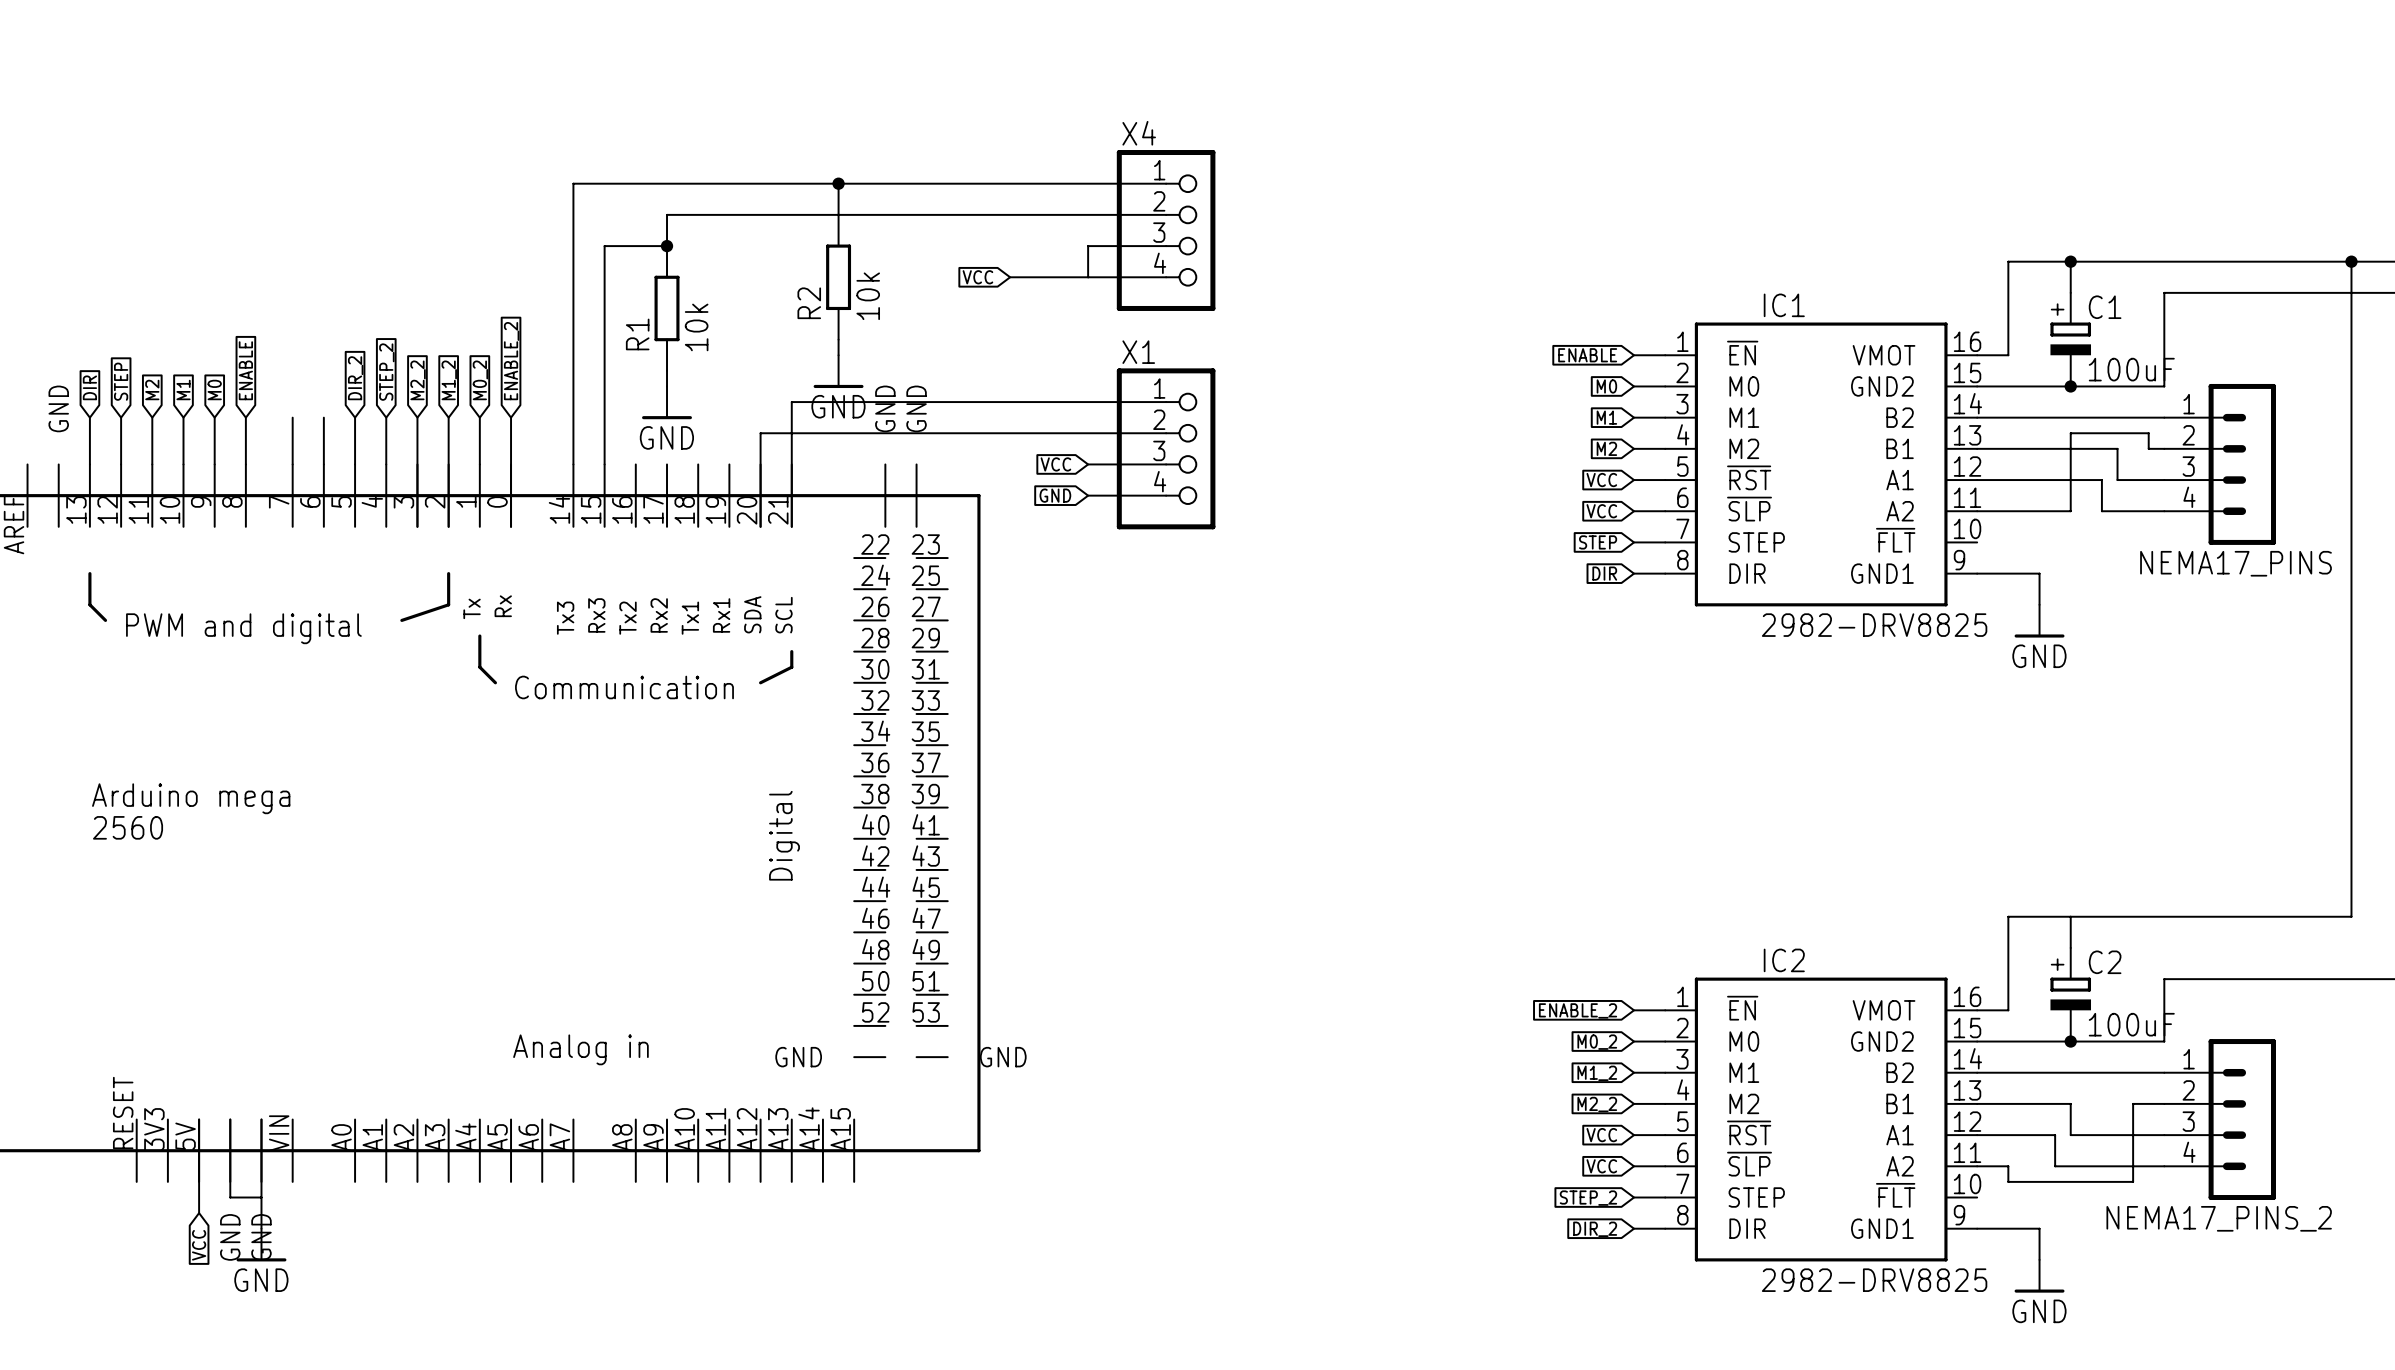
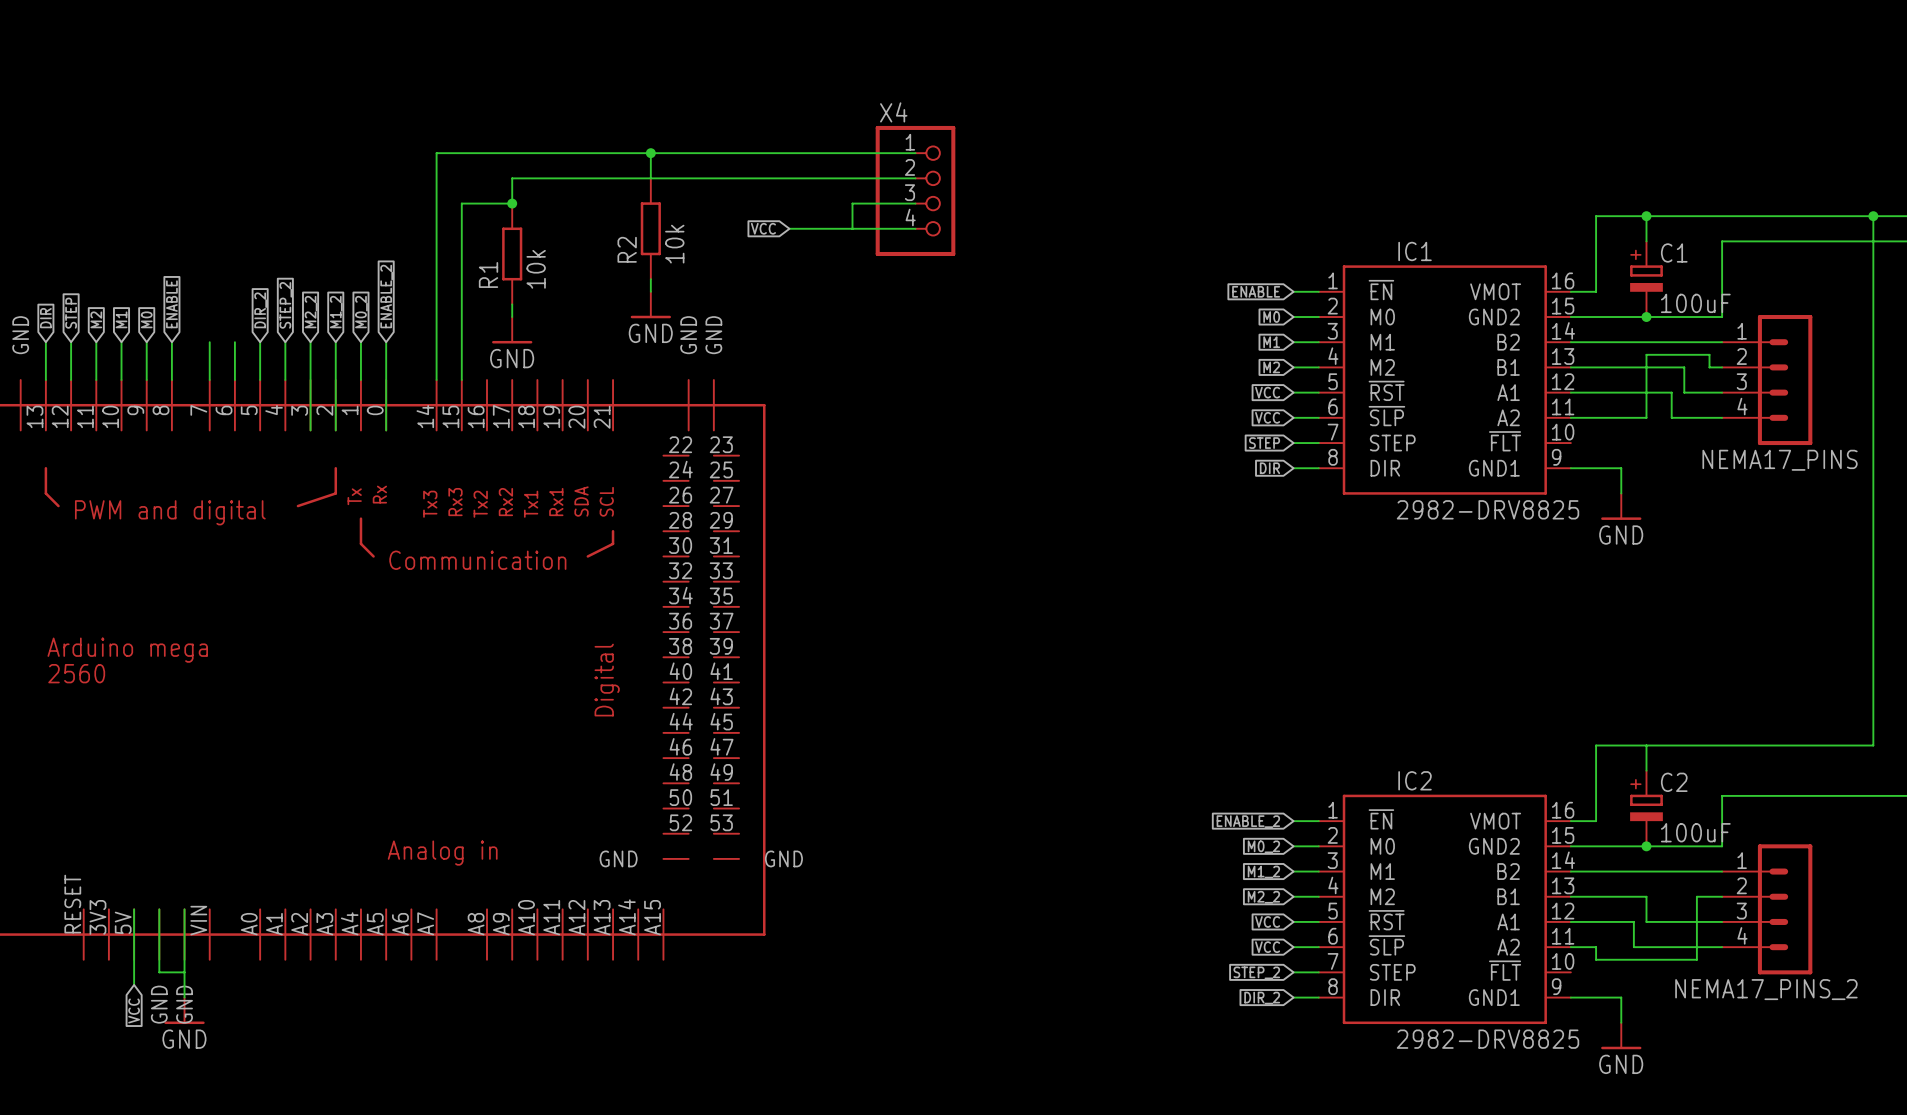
wire: (1166, 402) (791, 402) (791, 526) -> none
wire: (1166, 433) (760, 433) (760, 526) -> none
X1: (1166, 448) -> none
global label: VCC (1055, 464) -> none
wire: (1088, 464) (1166, 464) -> none
global label: GND (1055, 495) -> none
wire: (1088, 495) (1166, 495) -> none

